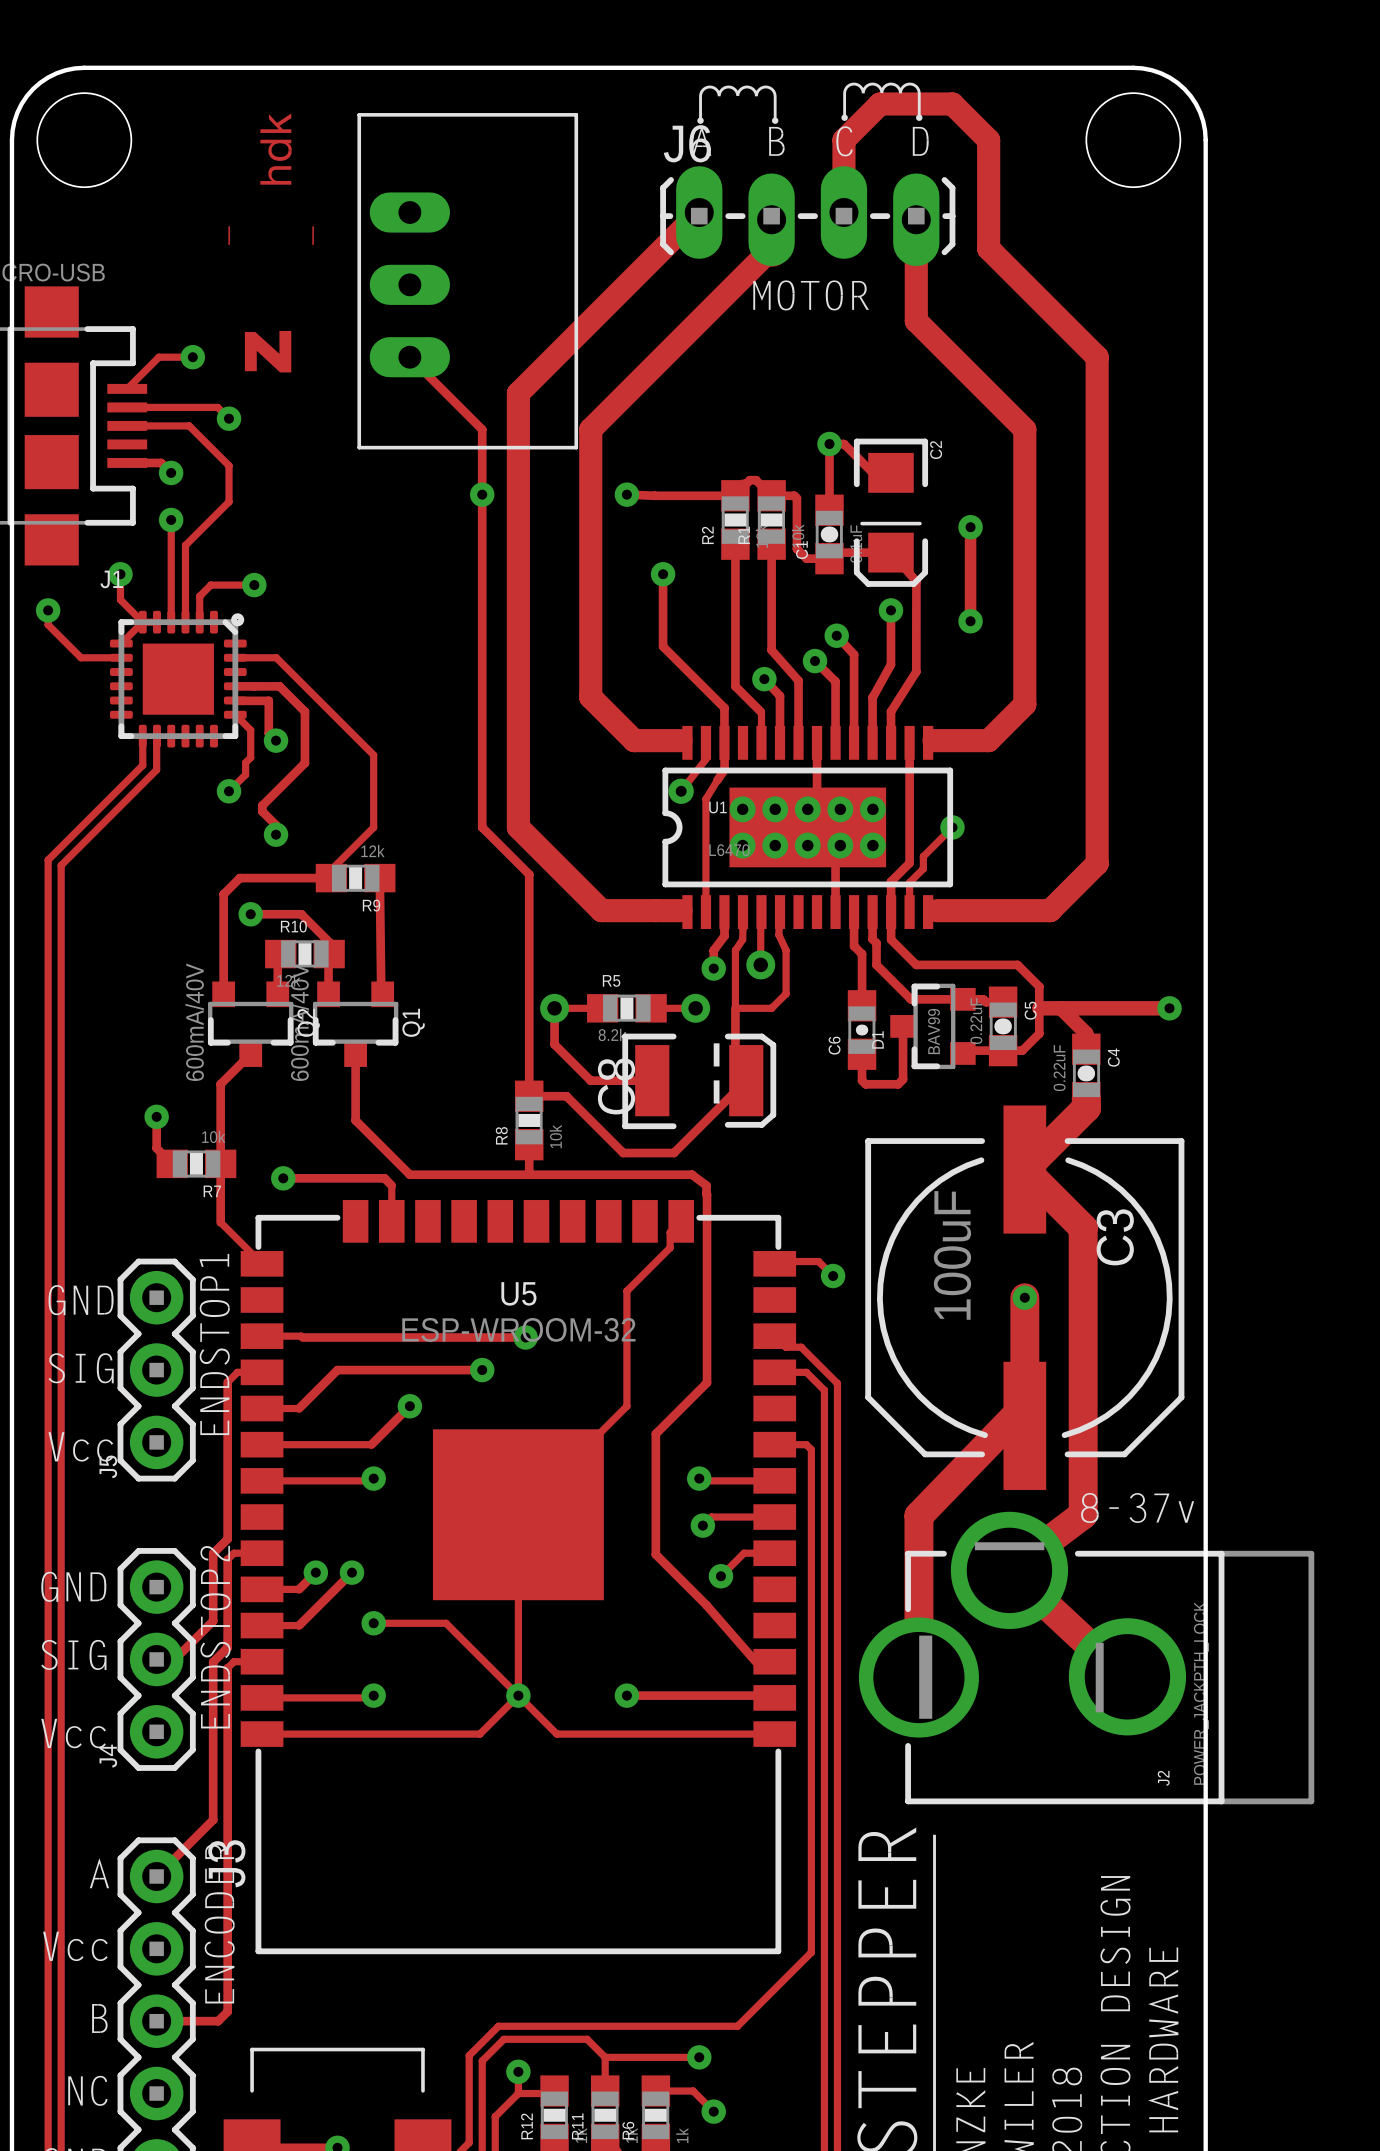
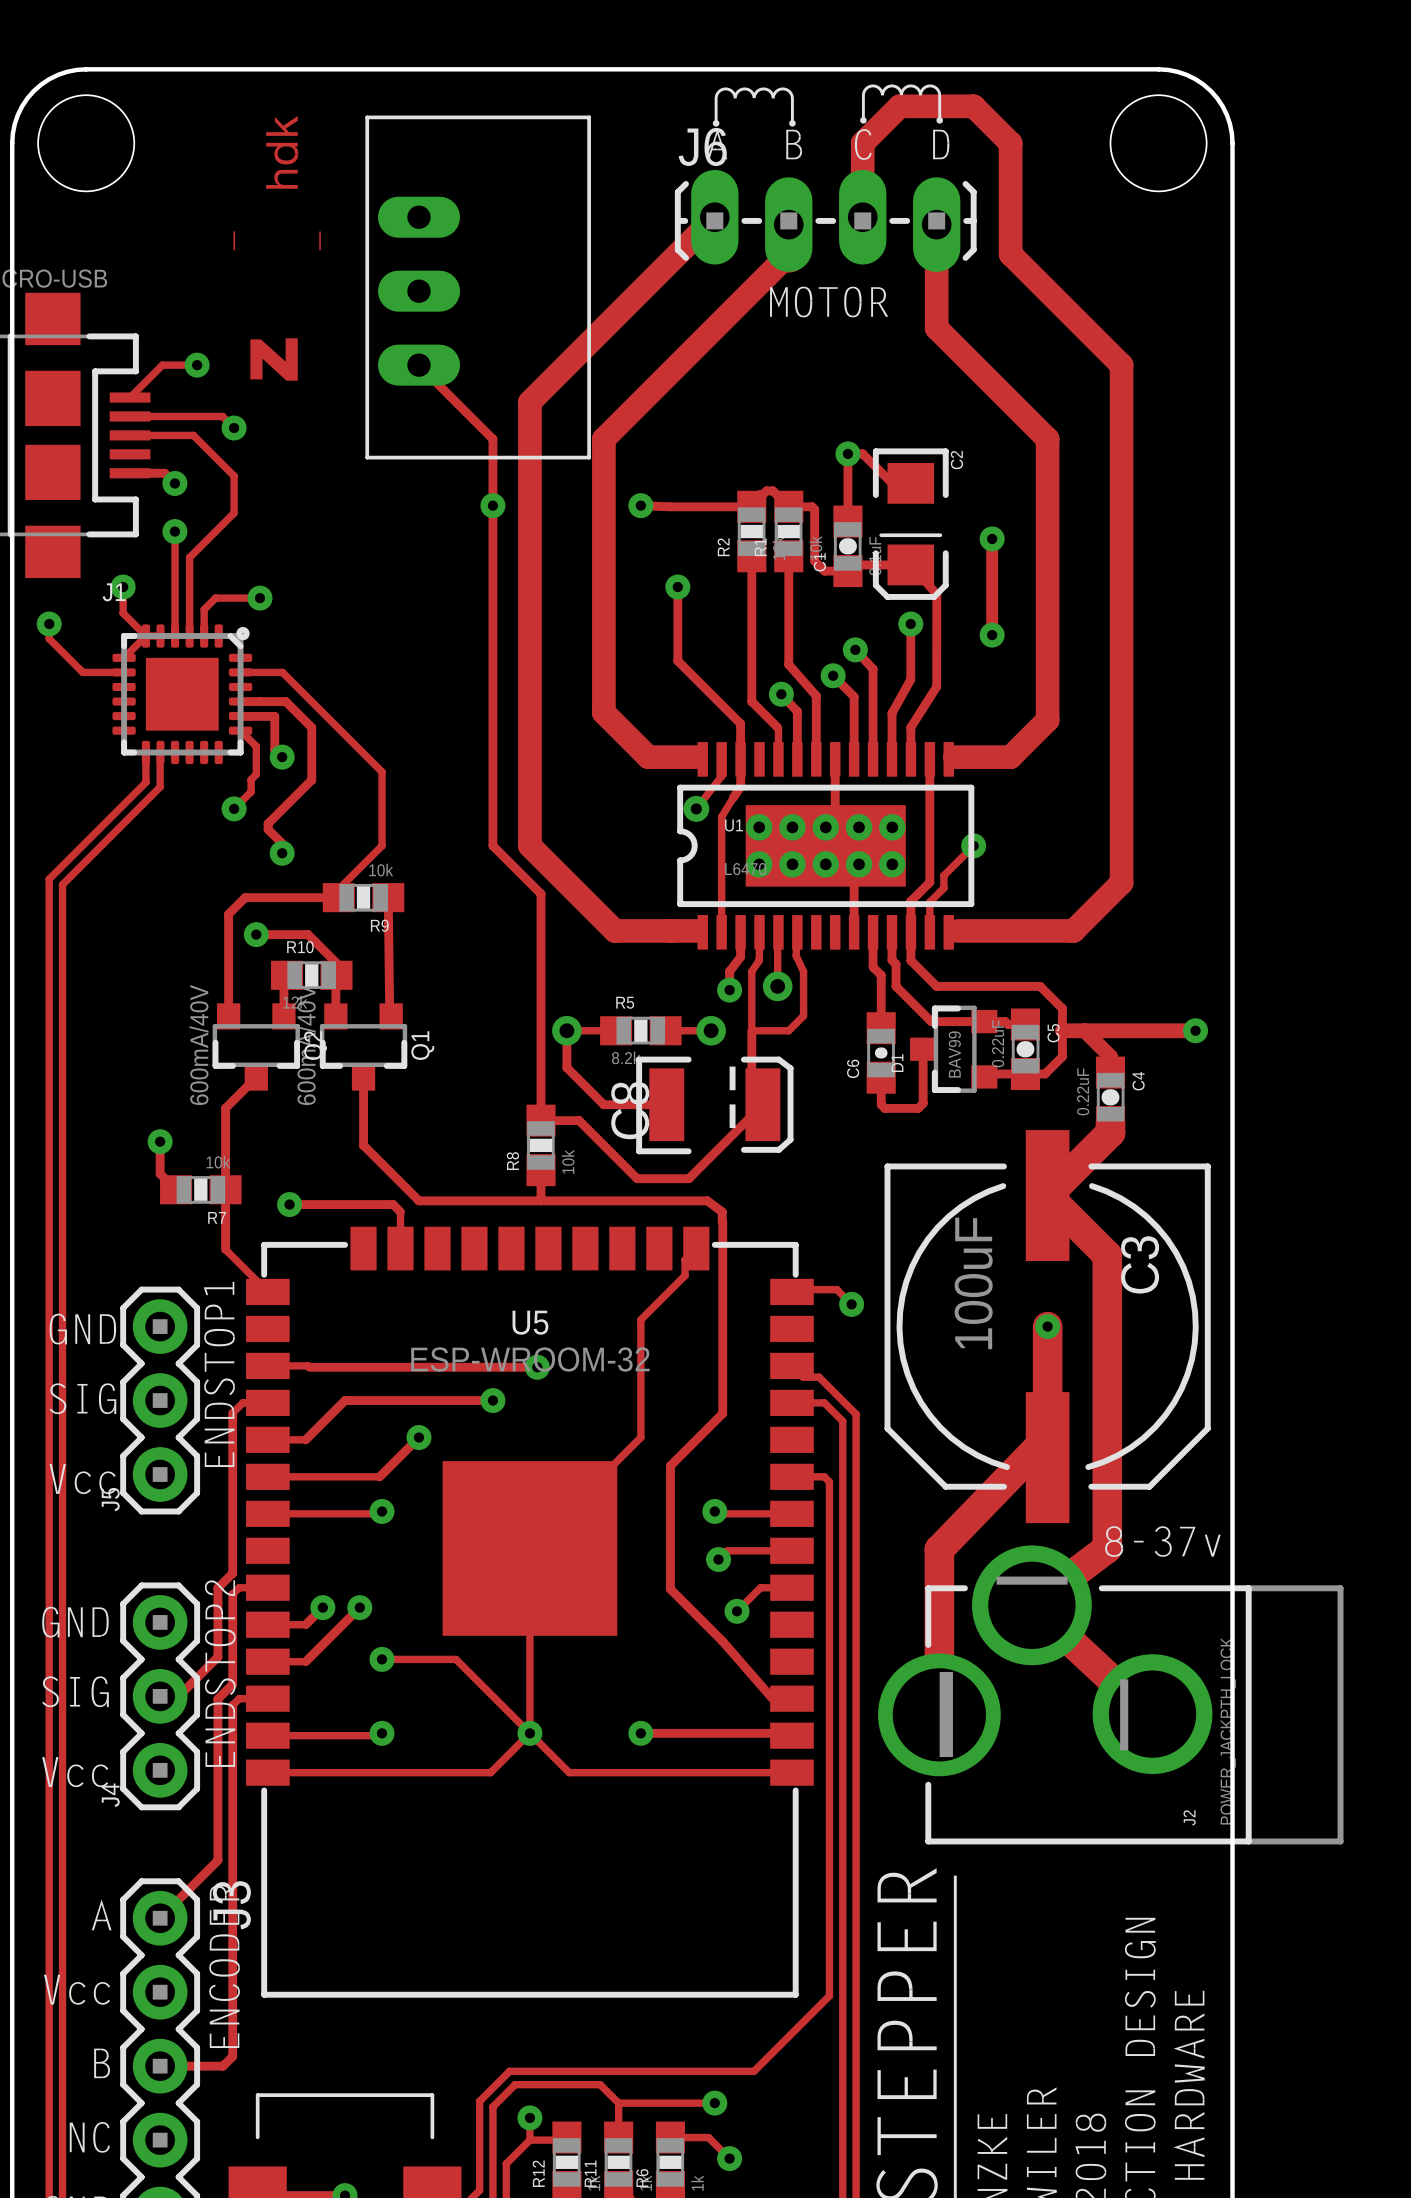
R9 value: 12k (372, 851) -> 10k (381, 870)

